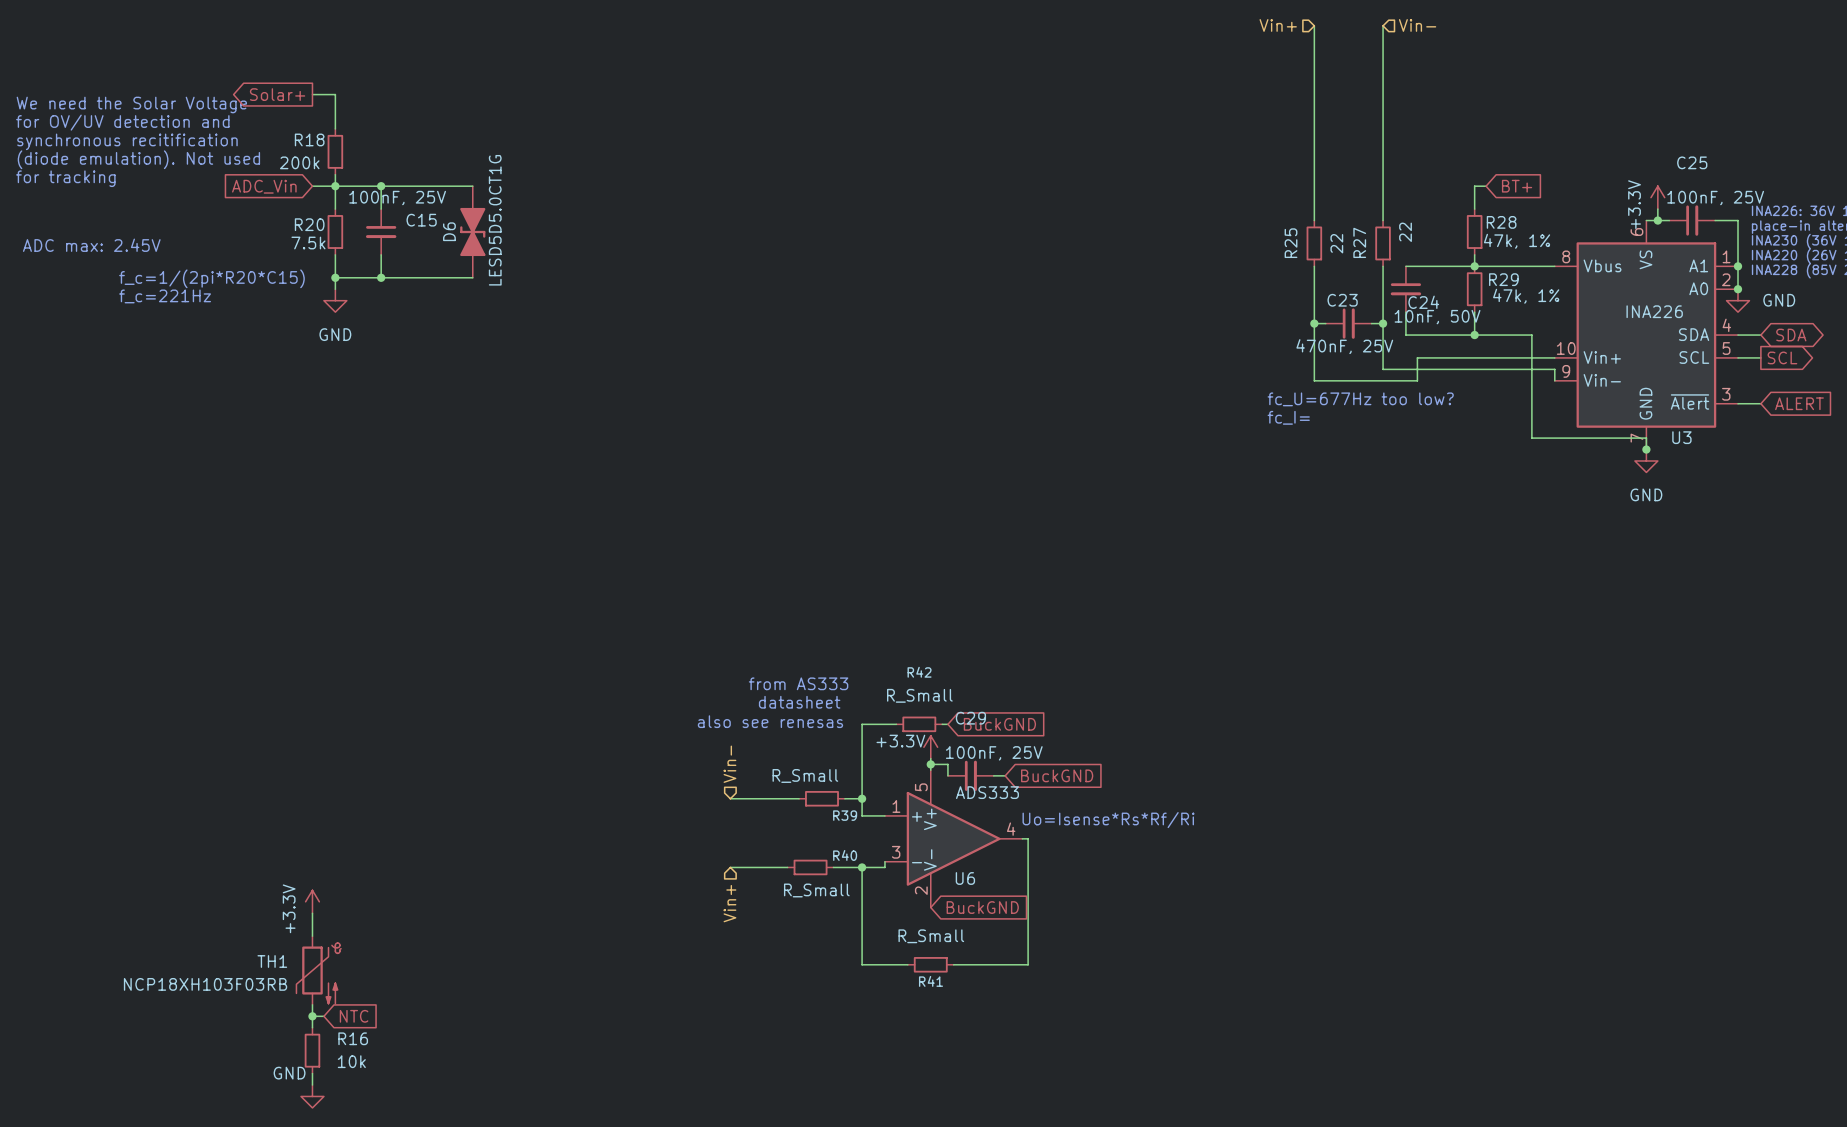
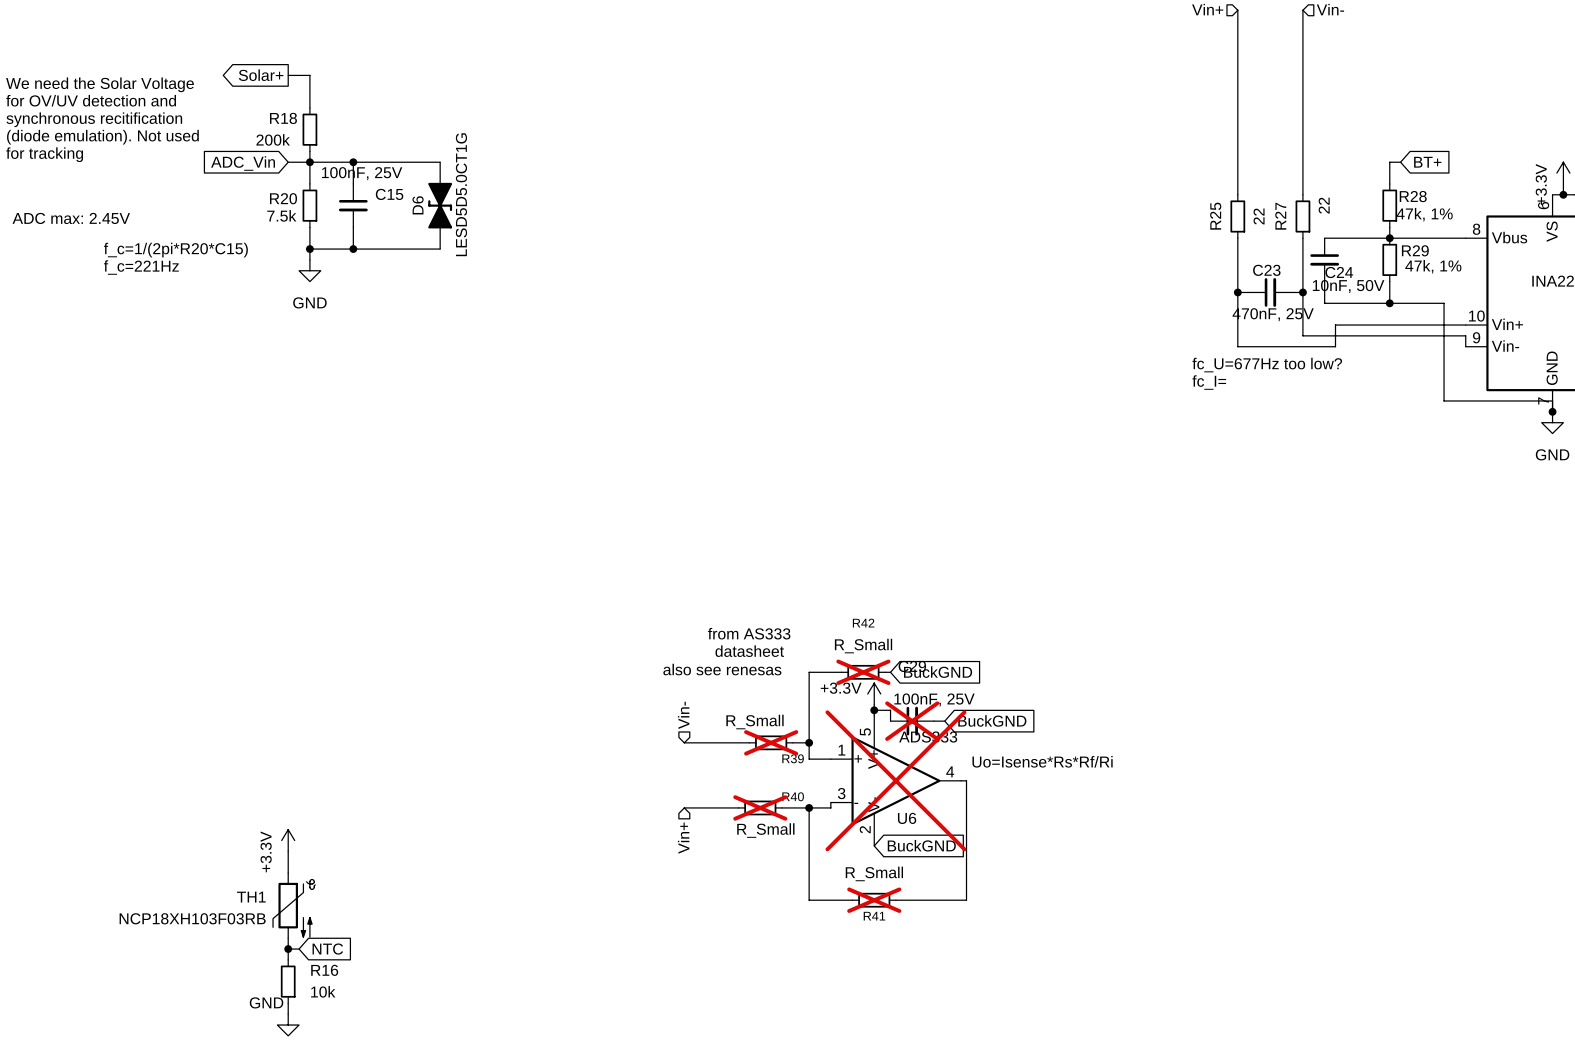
R42 do-not-place cross: none -> (863, 672)
C29 do-not-place cross: none -> (912, 721)
R39 do-not-place cross: none -> (771, 742)
U6 do-not-place cross: none -> (895, 780)
R40 do-not-place cross: none -> (760, 807)
R41 do-not-place cross: none -> (874, 900)

